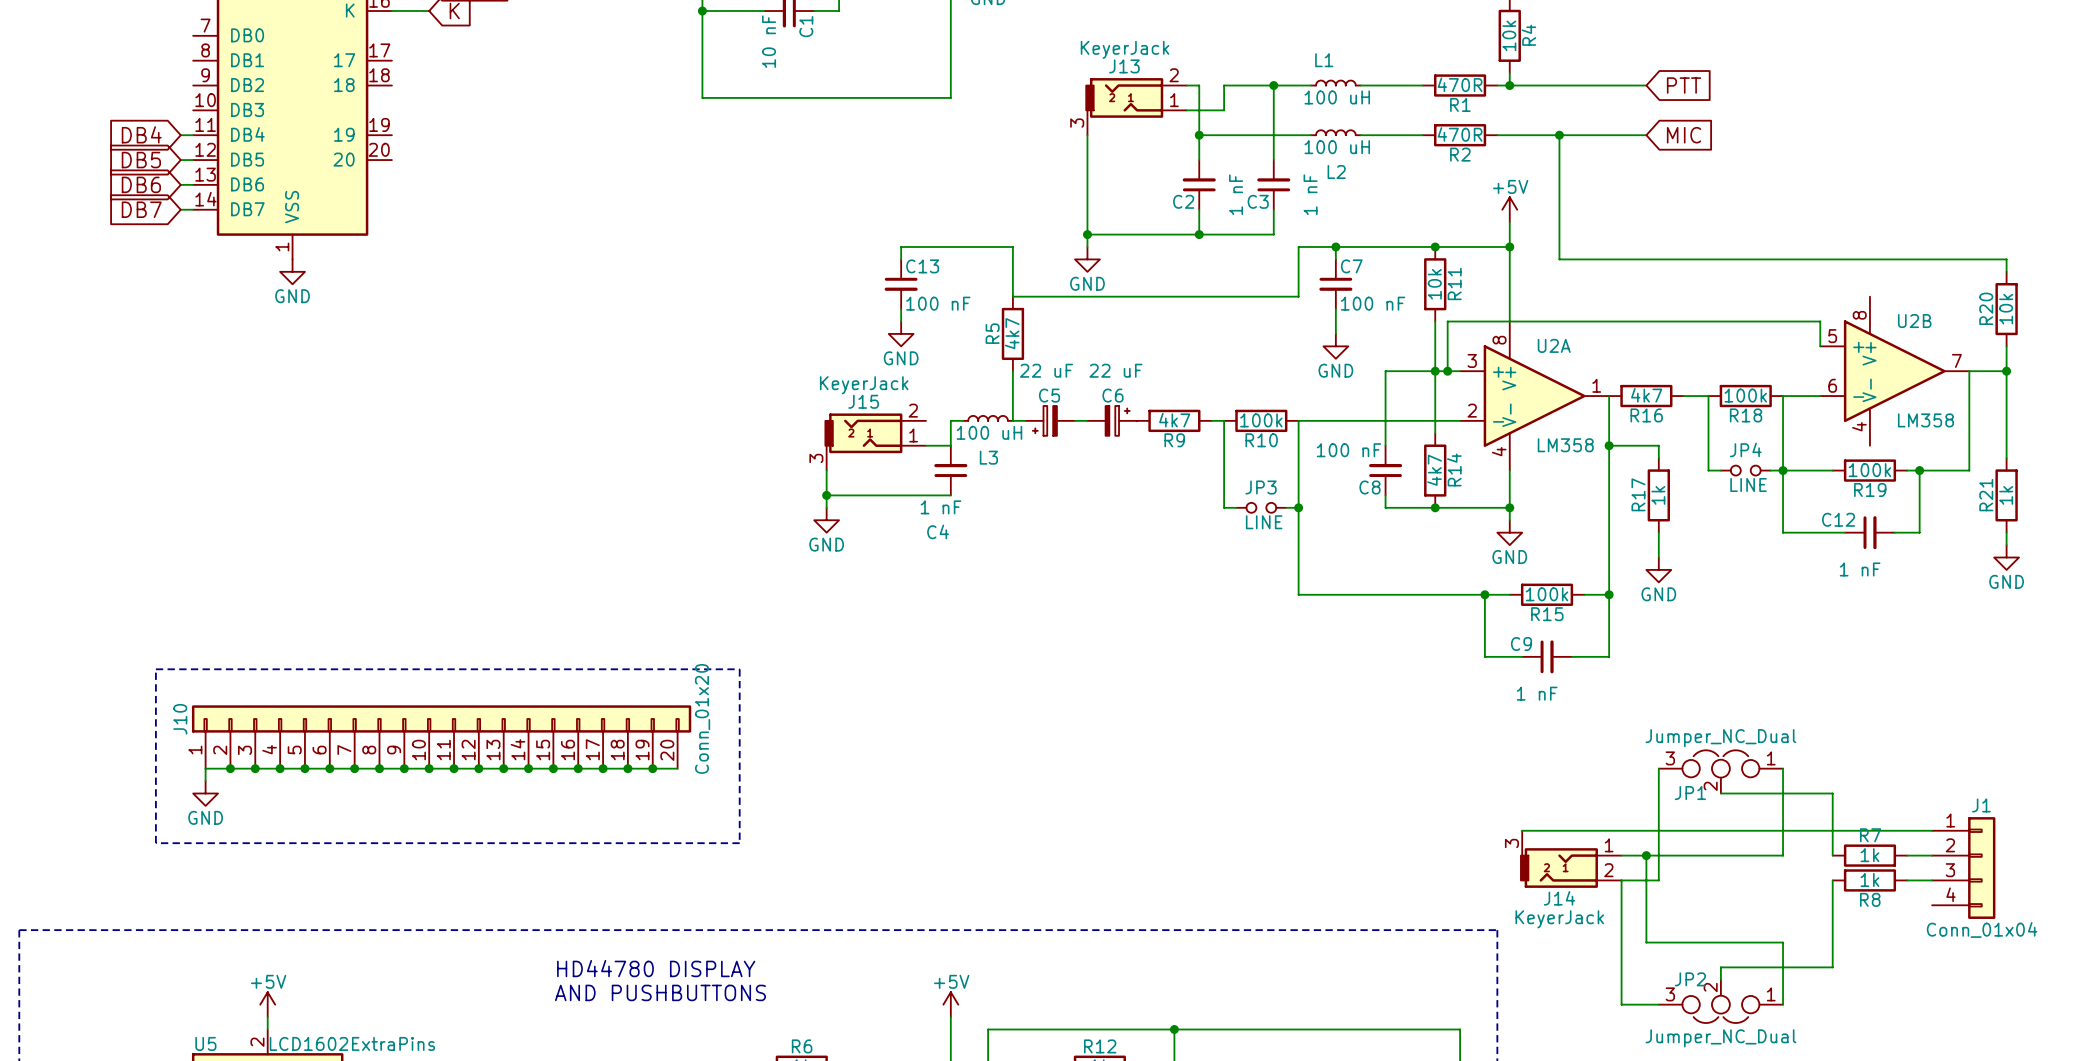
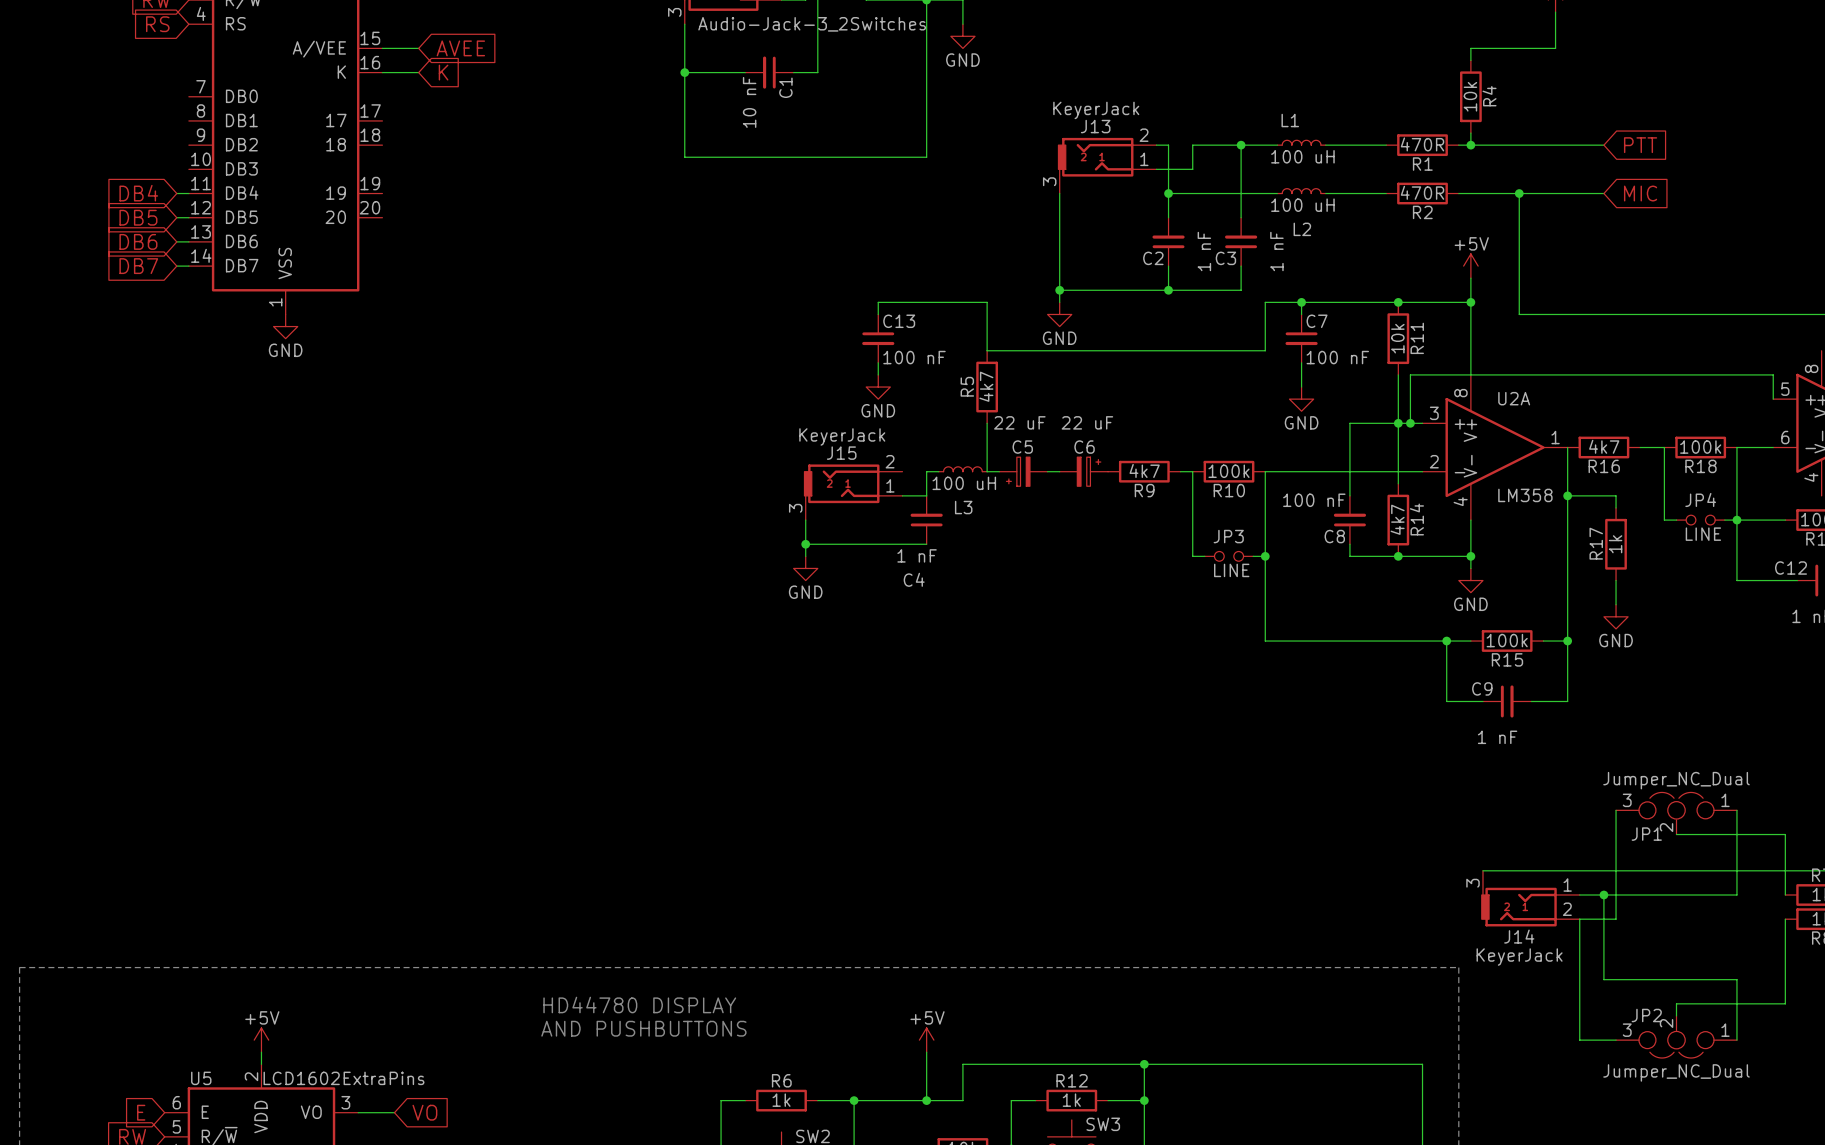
line: (155, 669) (739, 669) (739, 843) (155, 843) (155, 669) -> none
J10: Conn_01x20 (441, 736) -> none
junction: (230, 768) -> none
junction: (255, 768) -> none
junction: (280, 768) -> none
junction: (304, 768) -> none
junction: (329, 768) -> none
junction: (354, 768) -> none
junction: (379, 768) -> none
junction: (404, 768) -> none
junction: (429, 768) -> none
junction: (454, 768) -> none
junction: (478, 768) -> none
junction: (503, 768) -> none
junction: (528, 768) -> none
junction: (553, 768) -> none
junction: (578, 768) -> none
junction: (603, 768) -> none
junction: (627, 768) -> none
junction: (652, 768) -> none
wire: (677, 768) (205, 768) (205, 781) -> none
power symbol: GND (205, 793) -> none

